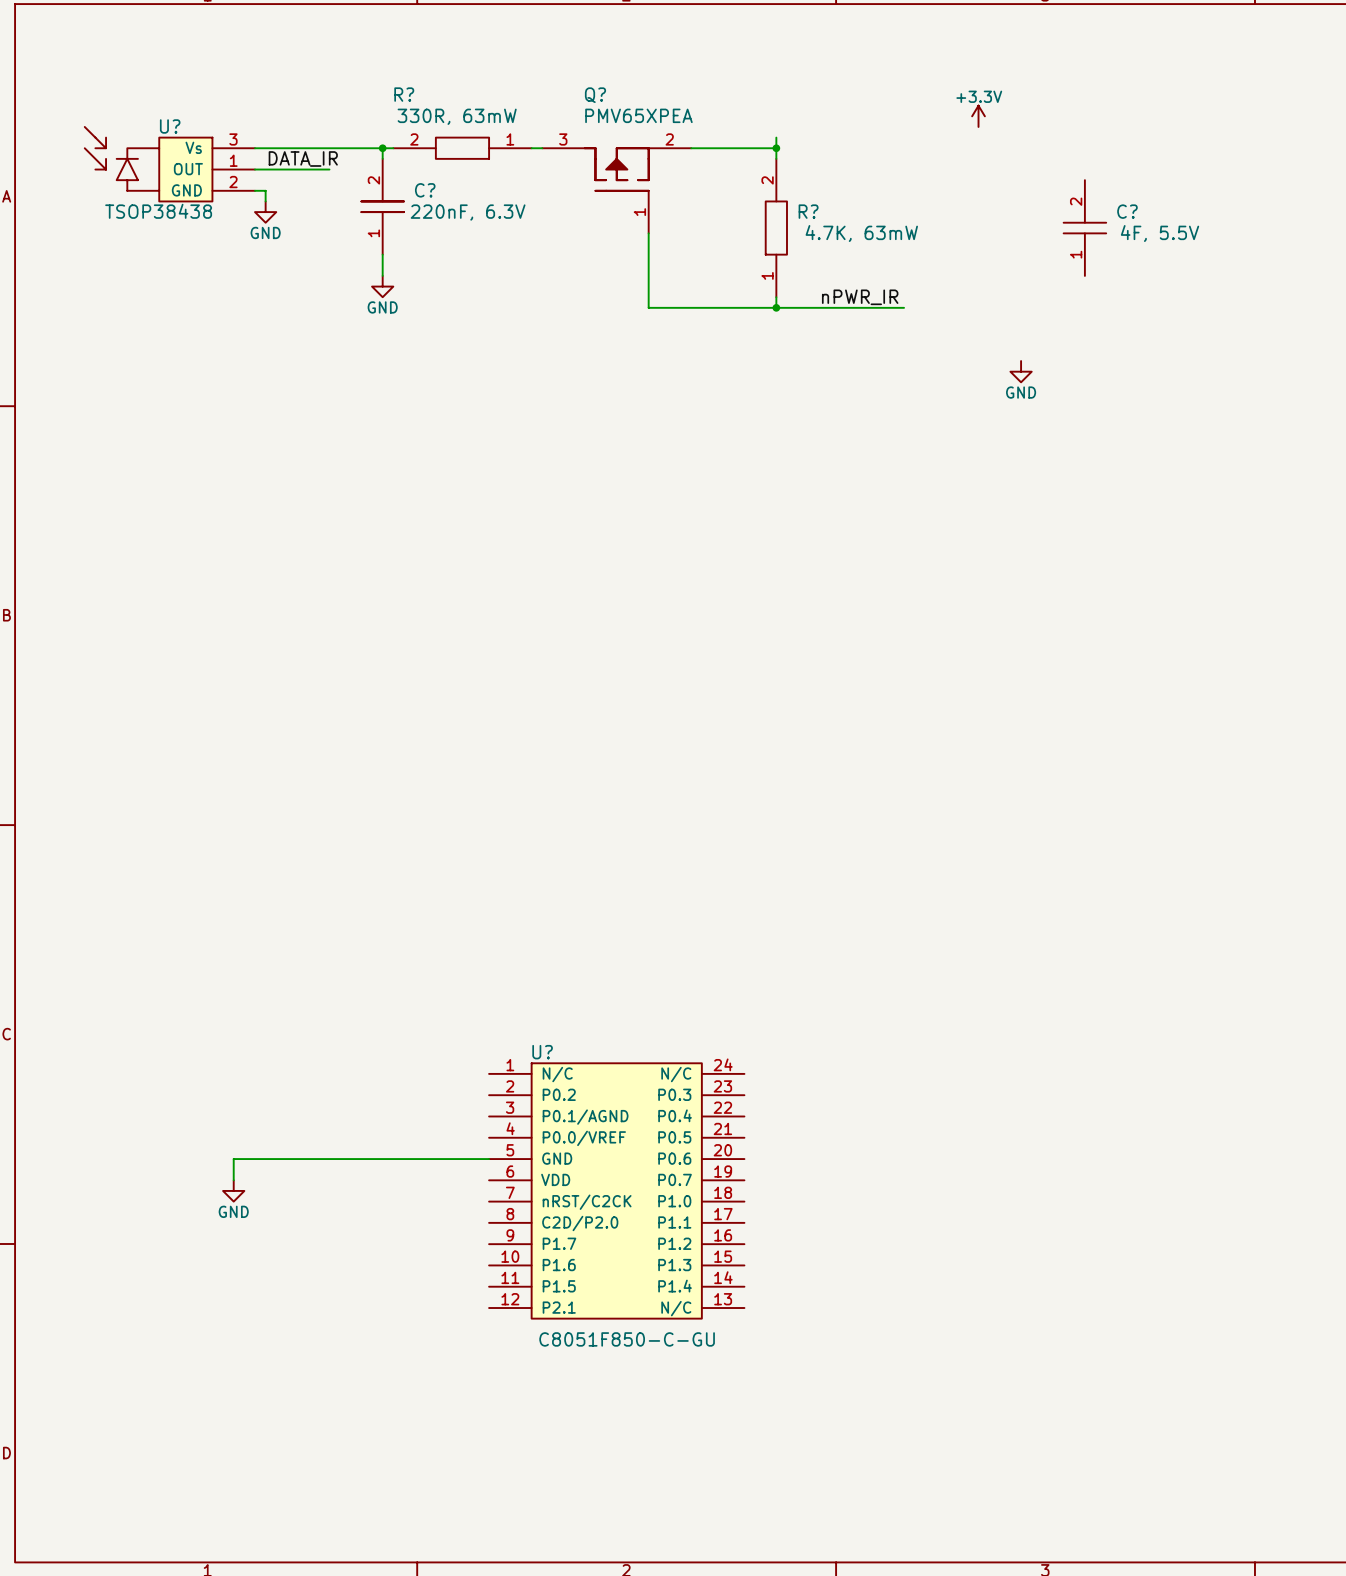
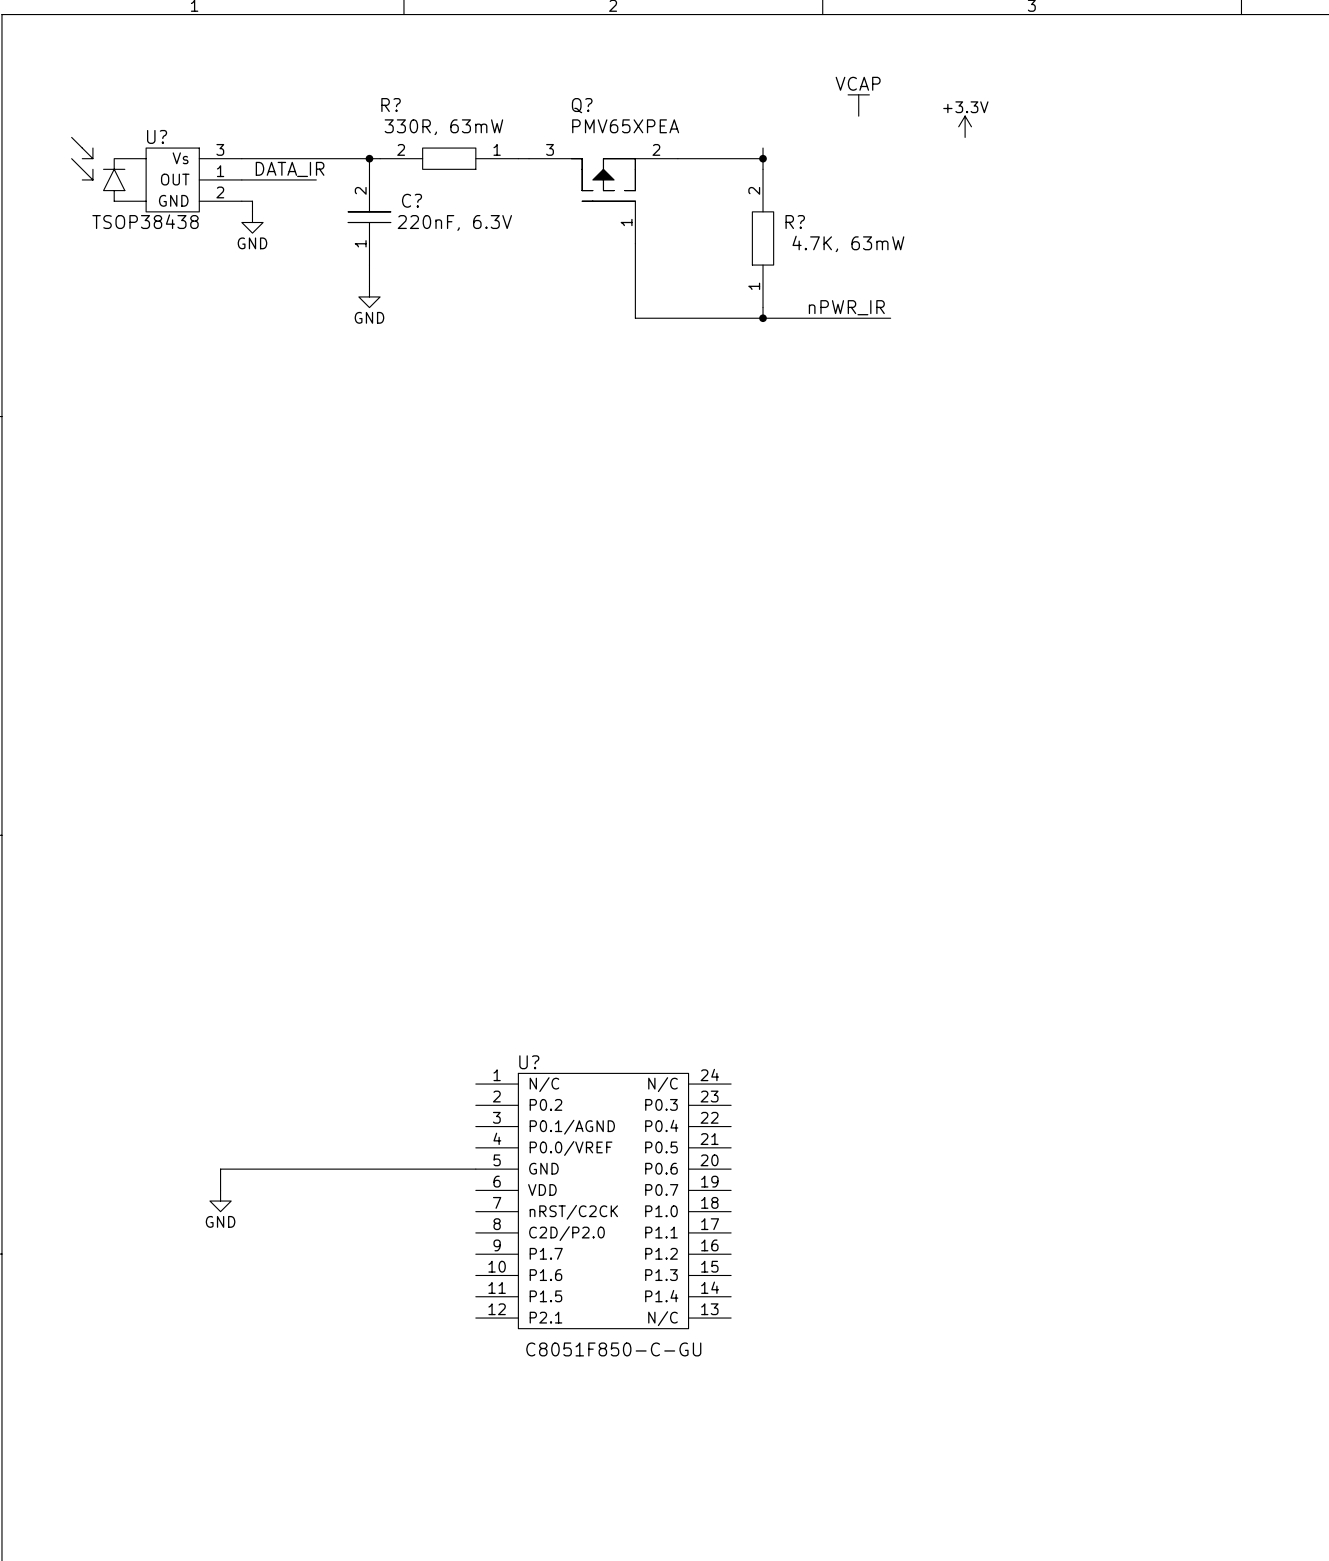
power symbol: none -> VCAP (858, 105)
C?: 4F, 5.5V (1084, 228) -> none
power symbol: GND (1021, 371) -> none

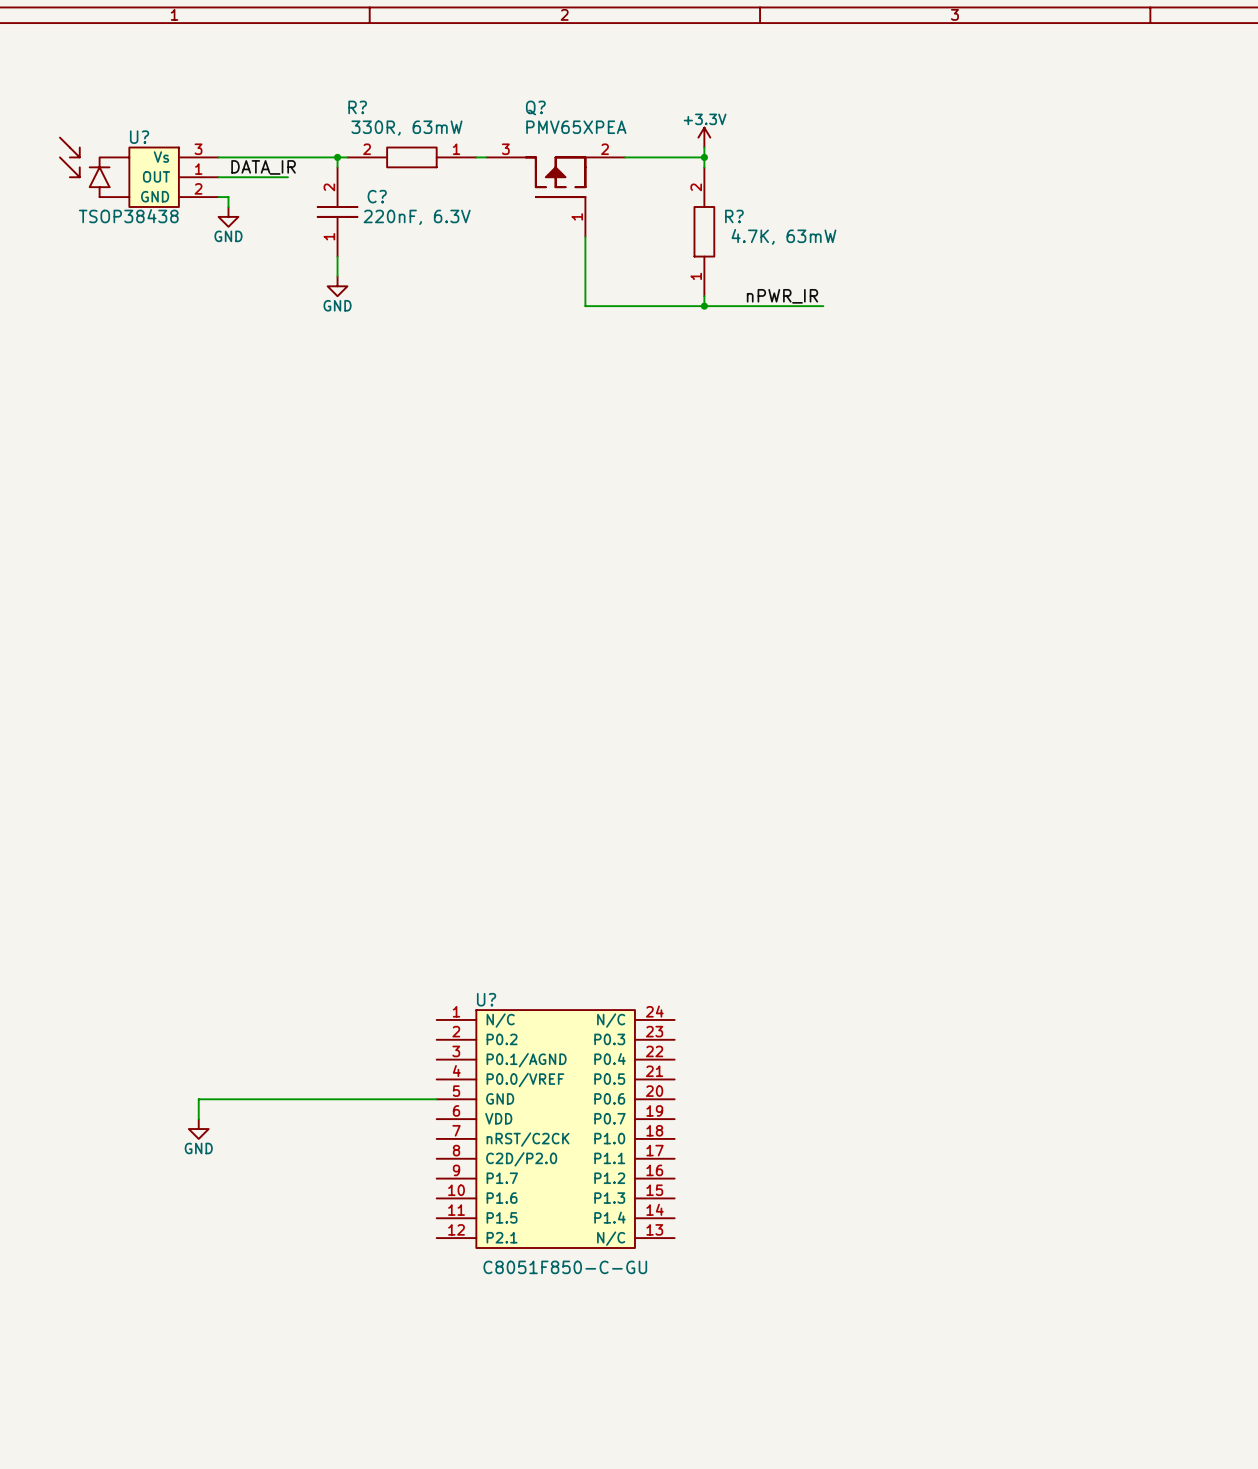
power symbol: VCAP (858, 105) -> none
power symbol position: +3.3V (965, 126) -> +3.3V (704, 137)

